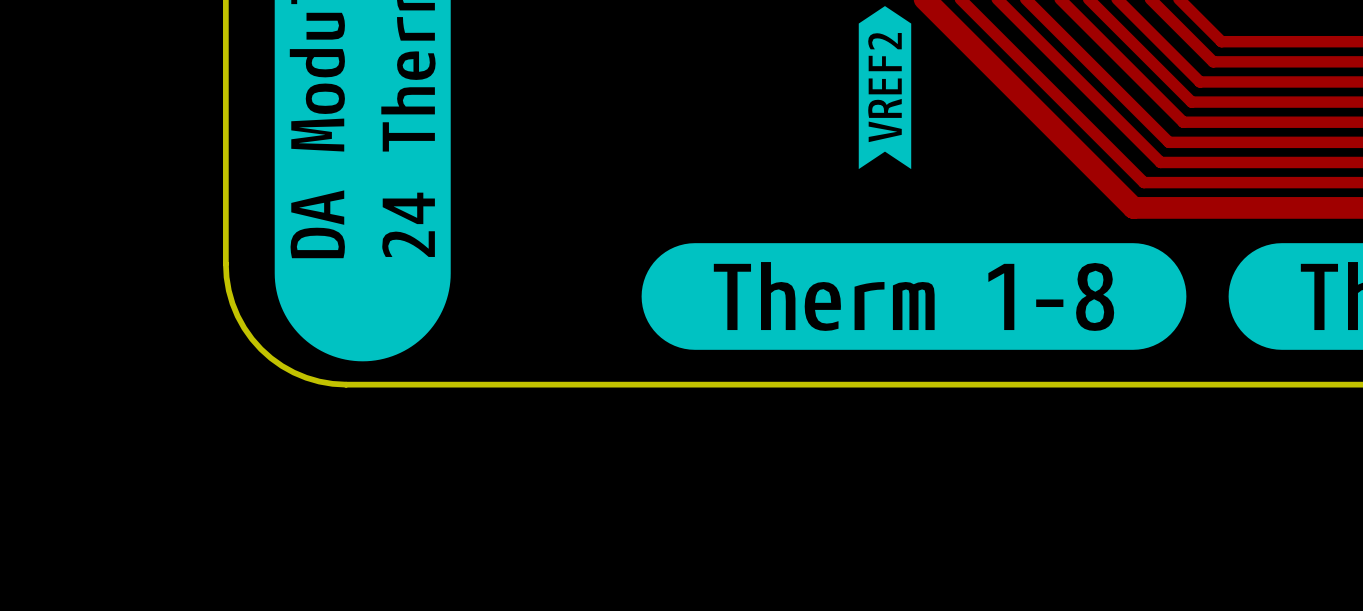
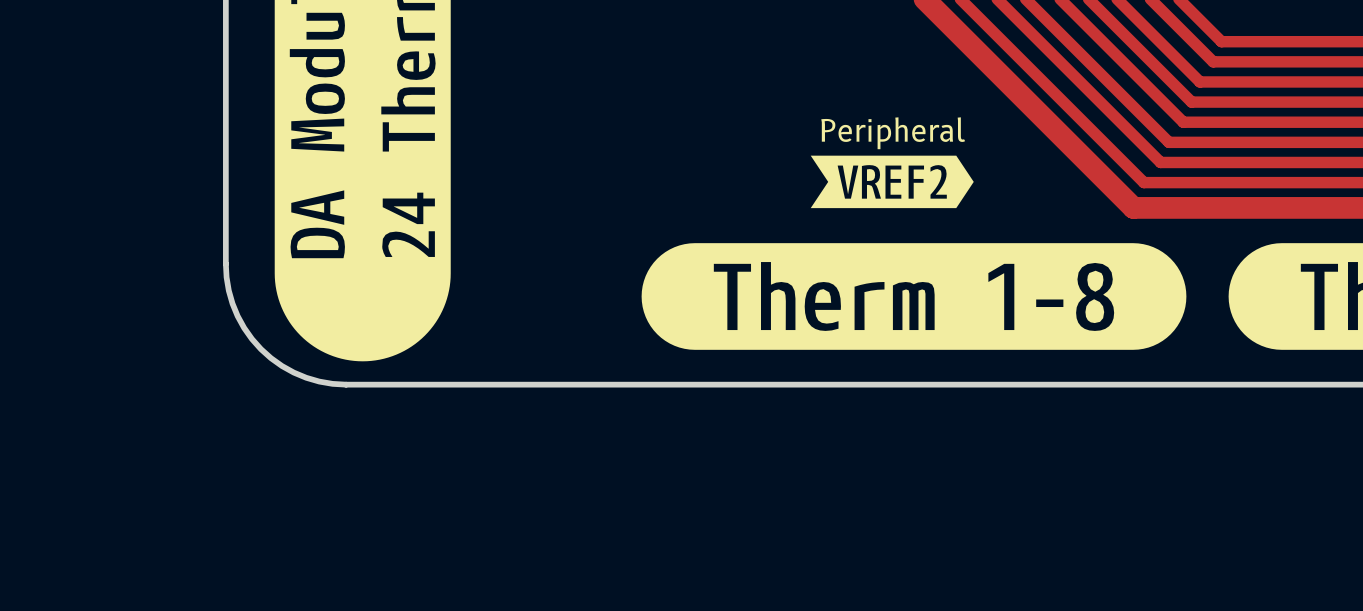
drawing: [858, 6, 912, 170] -> none
text: none -> Peripheral (893, 133)
drawing: none -> [810, 155, 974, 209]

